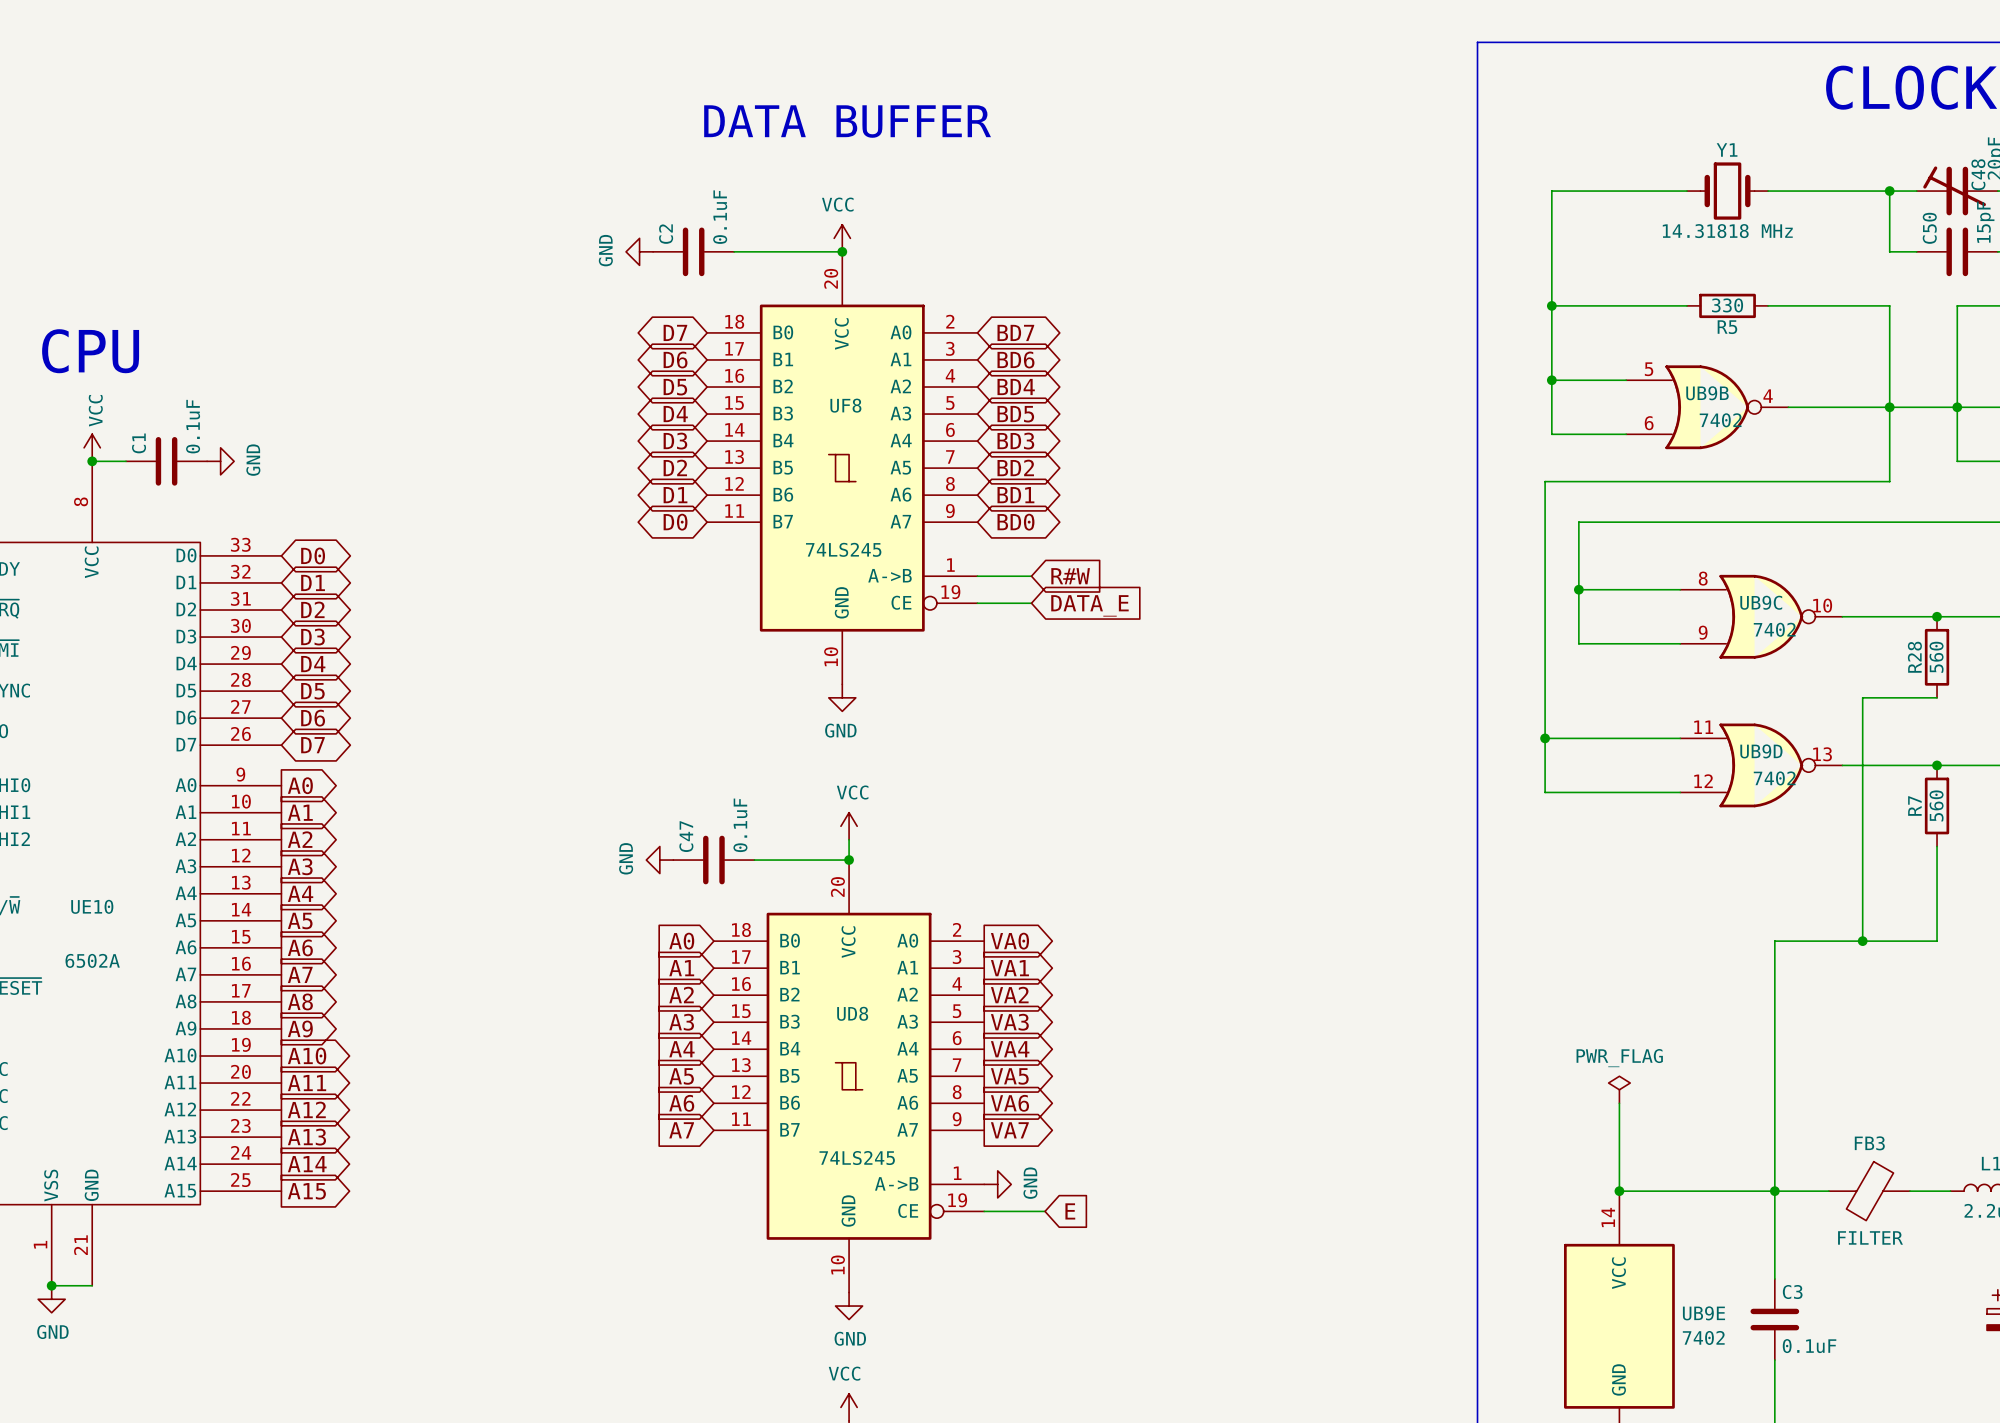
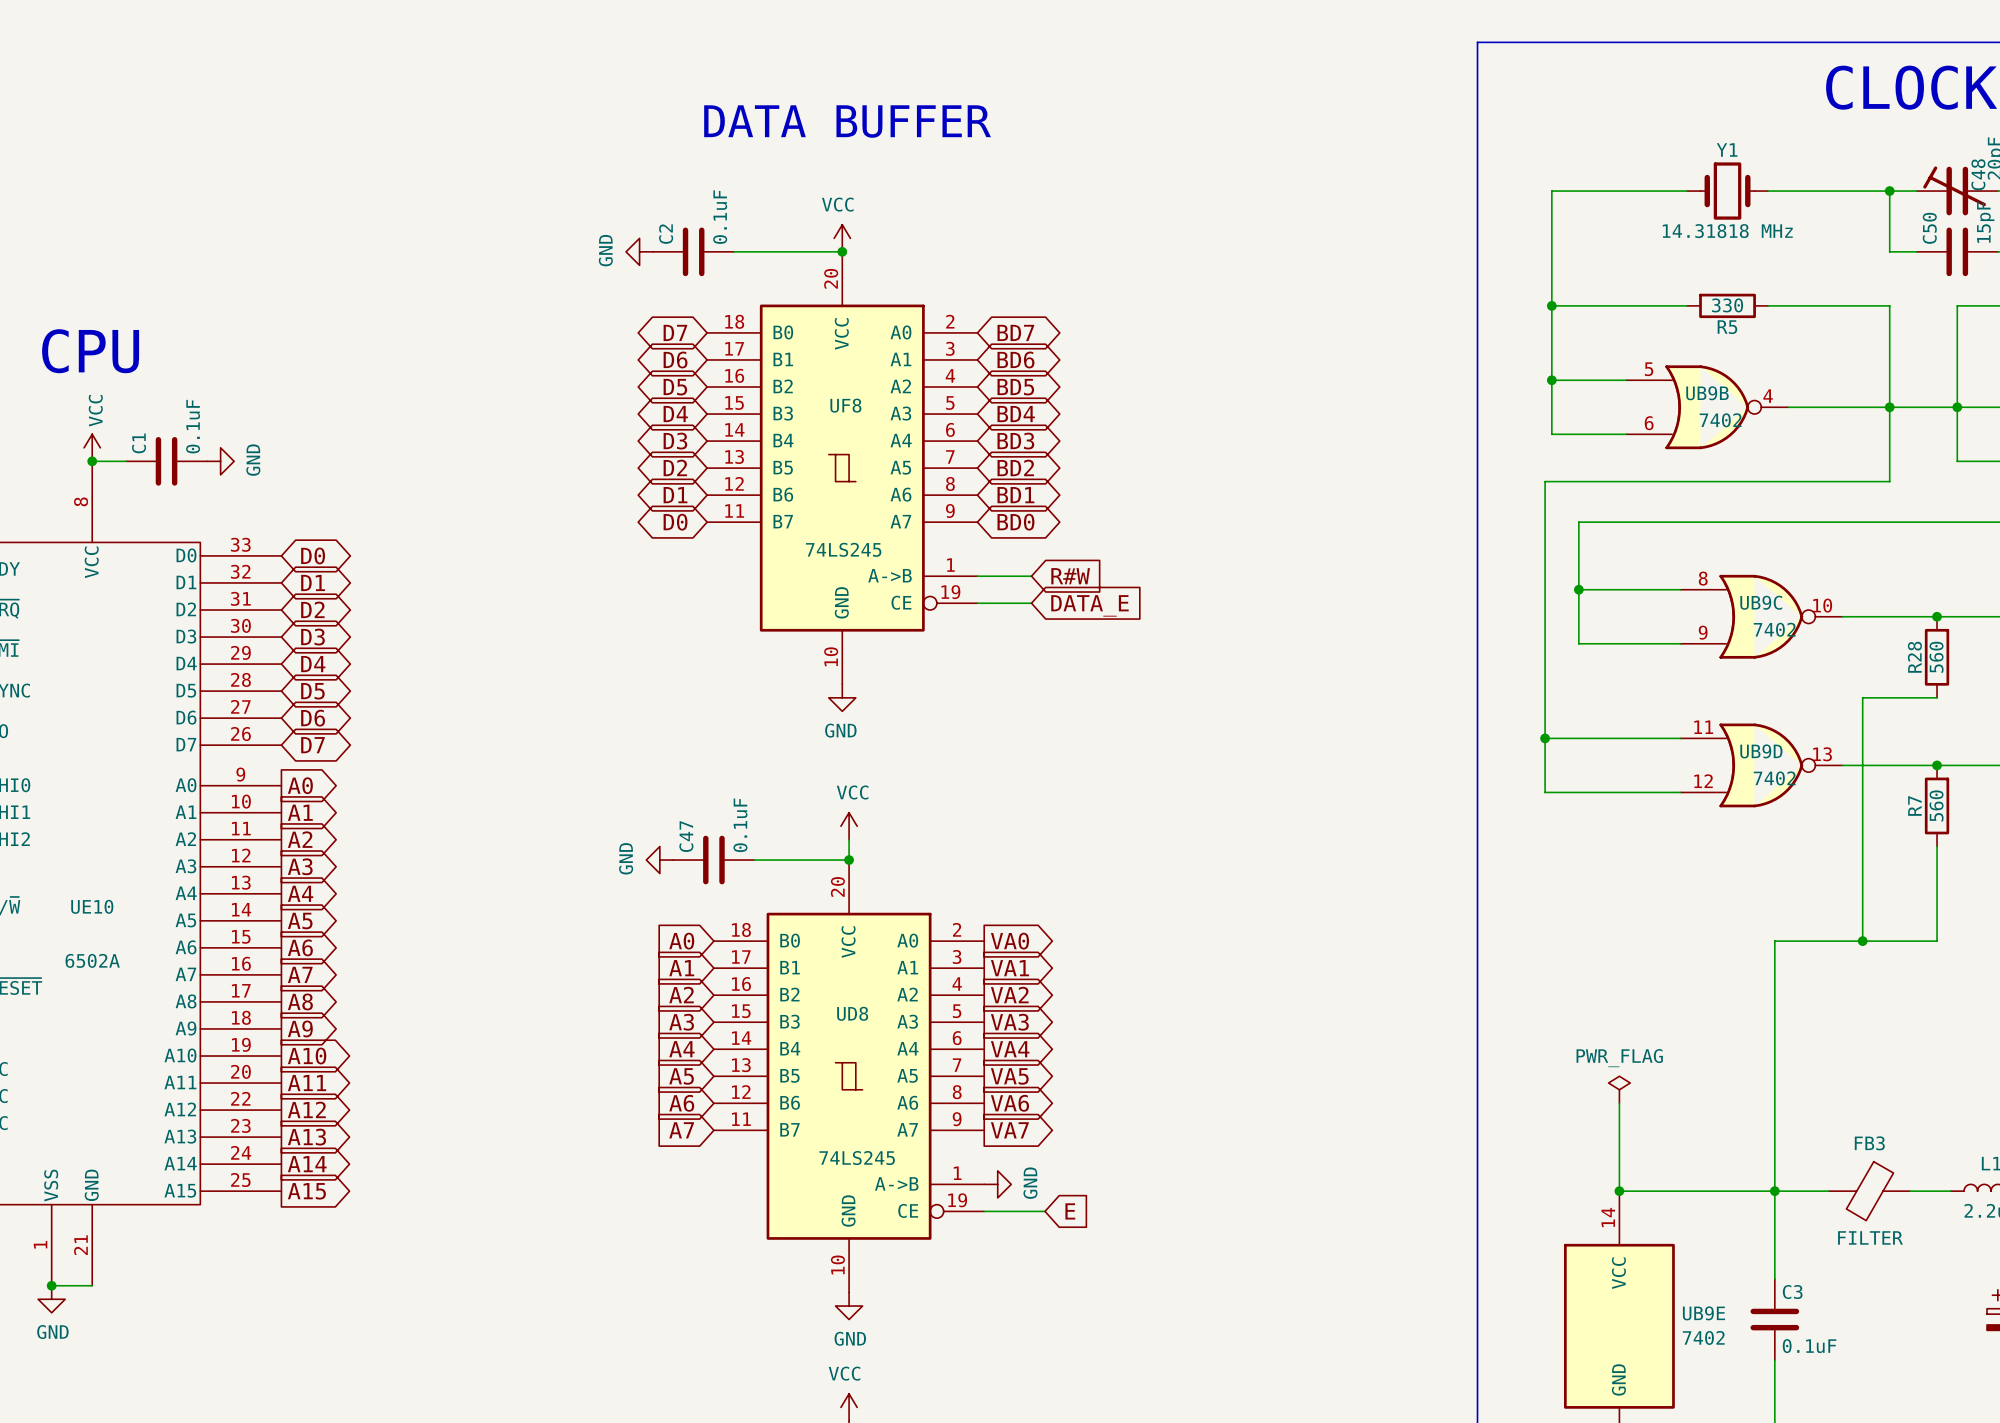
global label: BD4 (1016, 387) -> BD5 (1015, 387)
global label: BD5 (1015, 414) -> BD4 (1016, 414)

